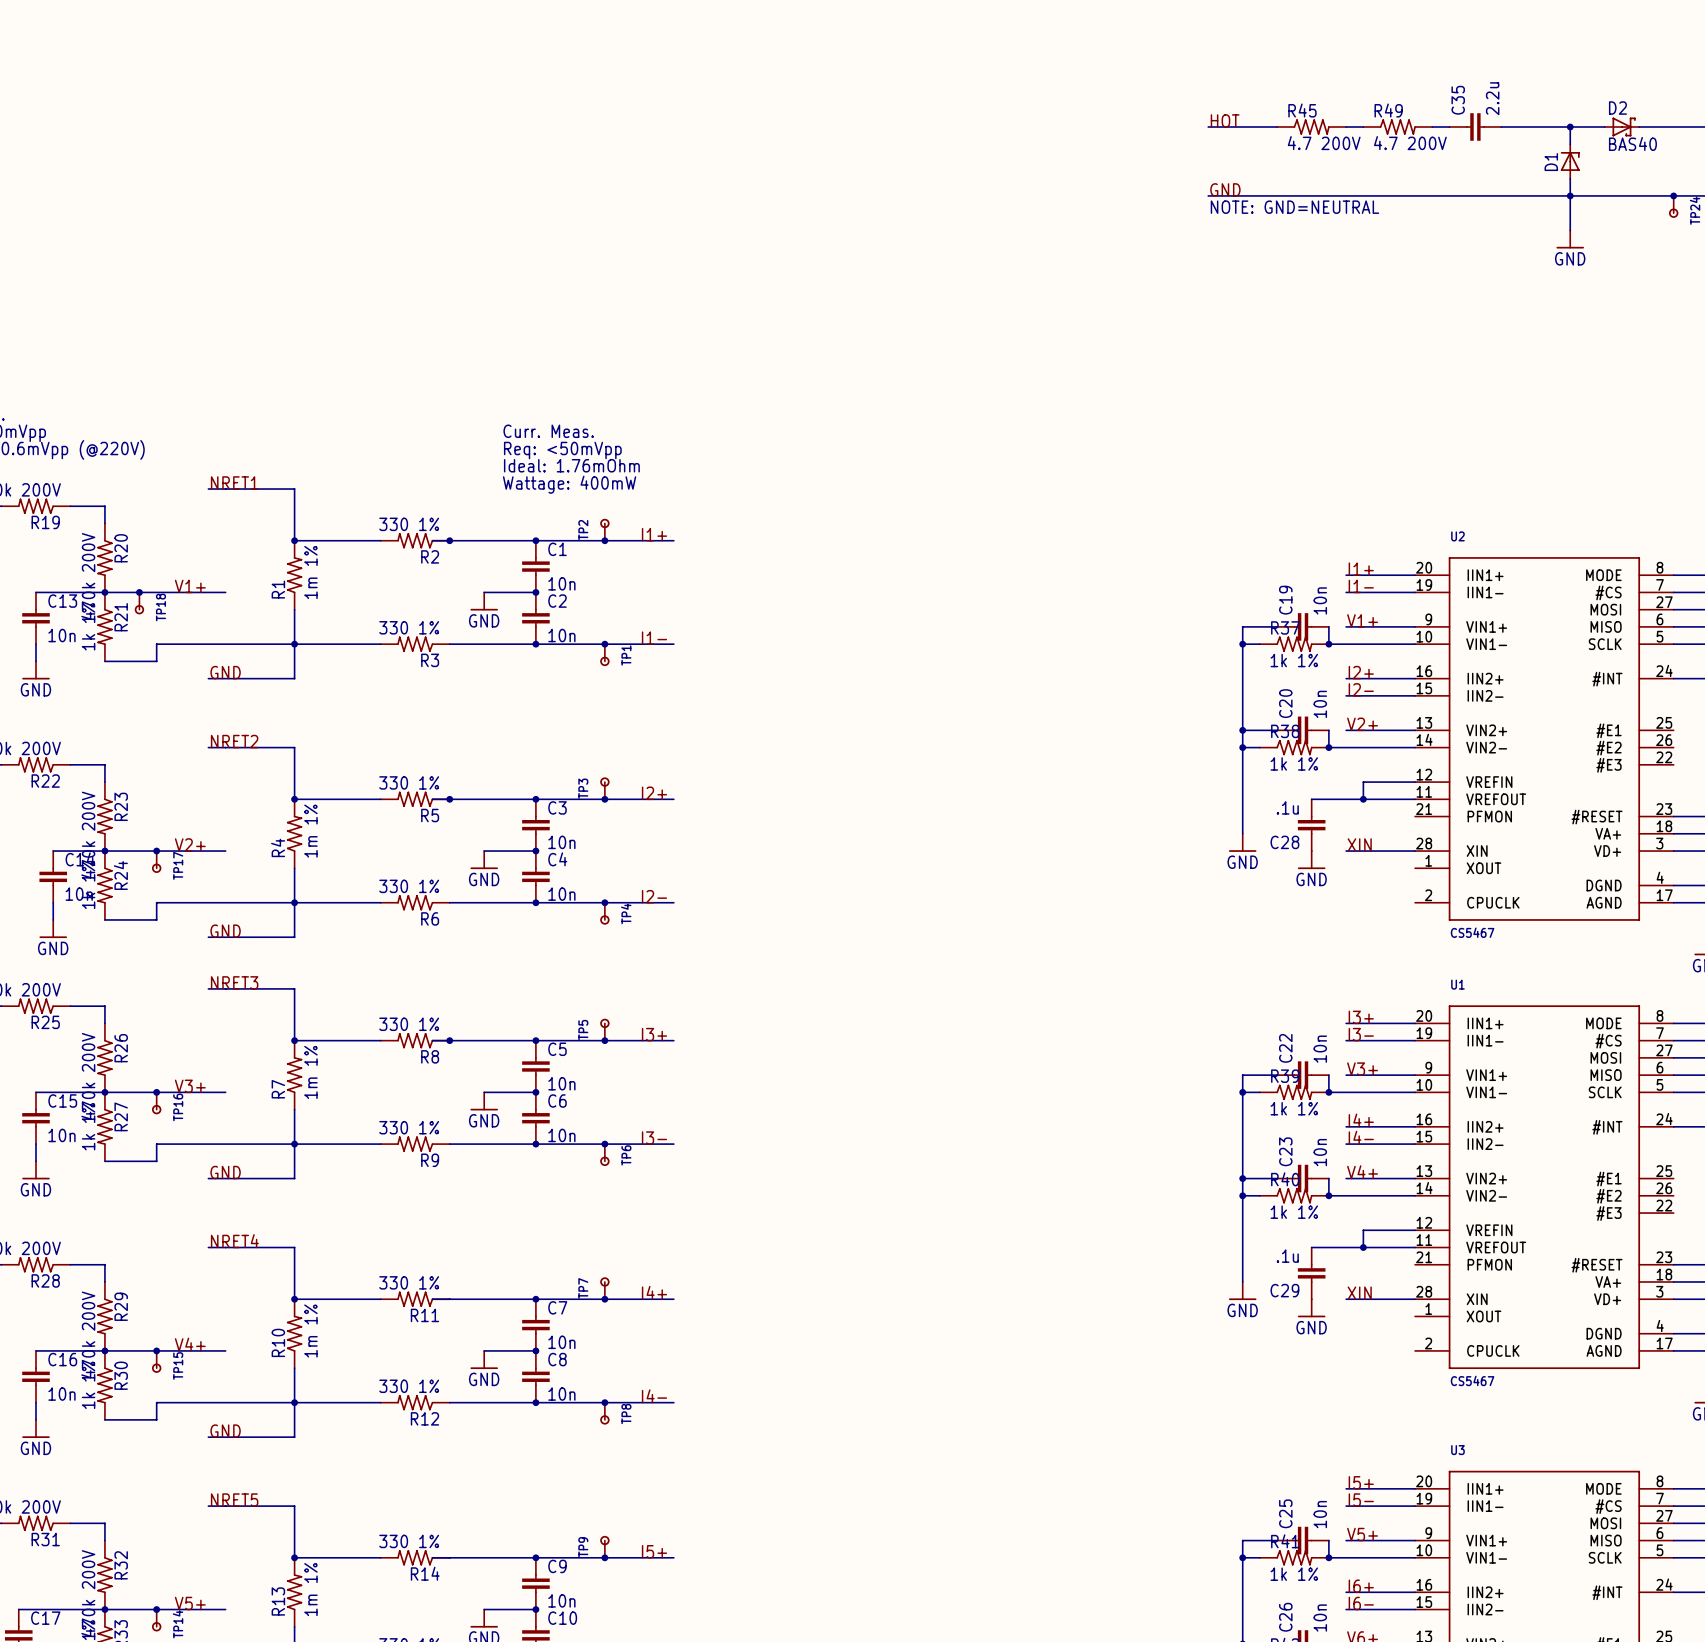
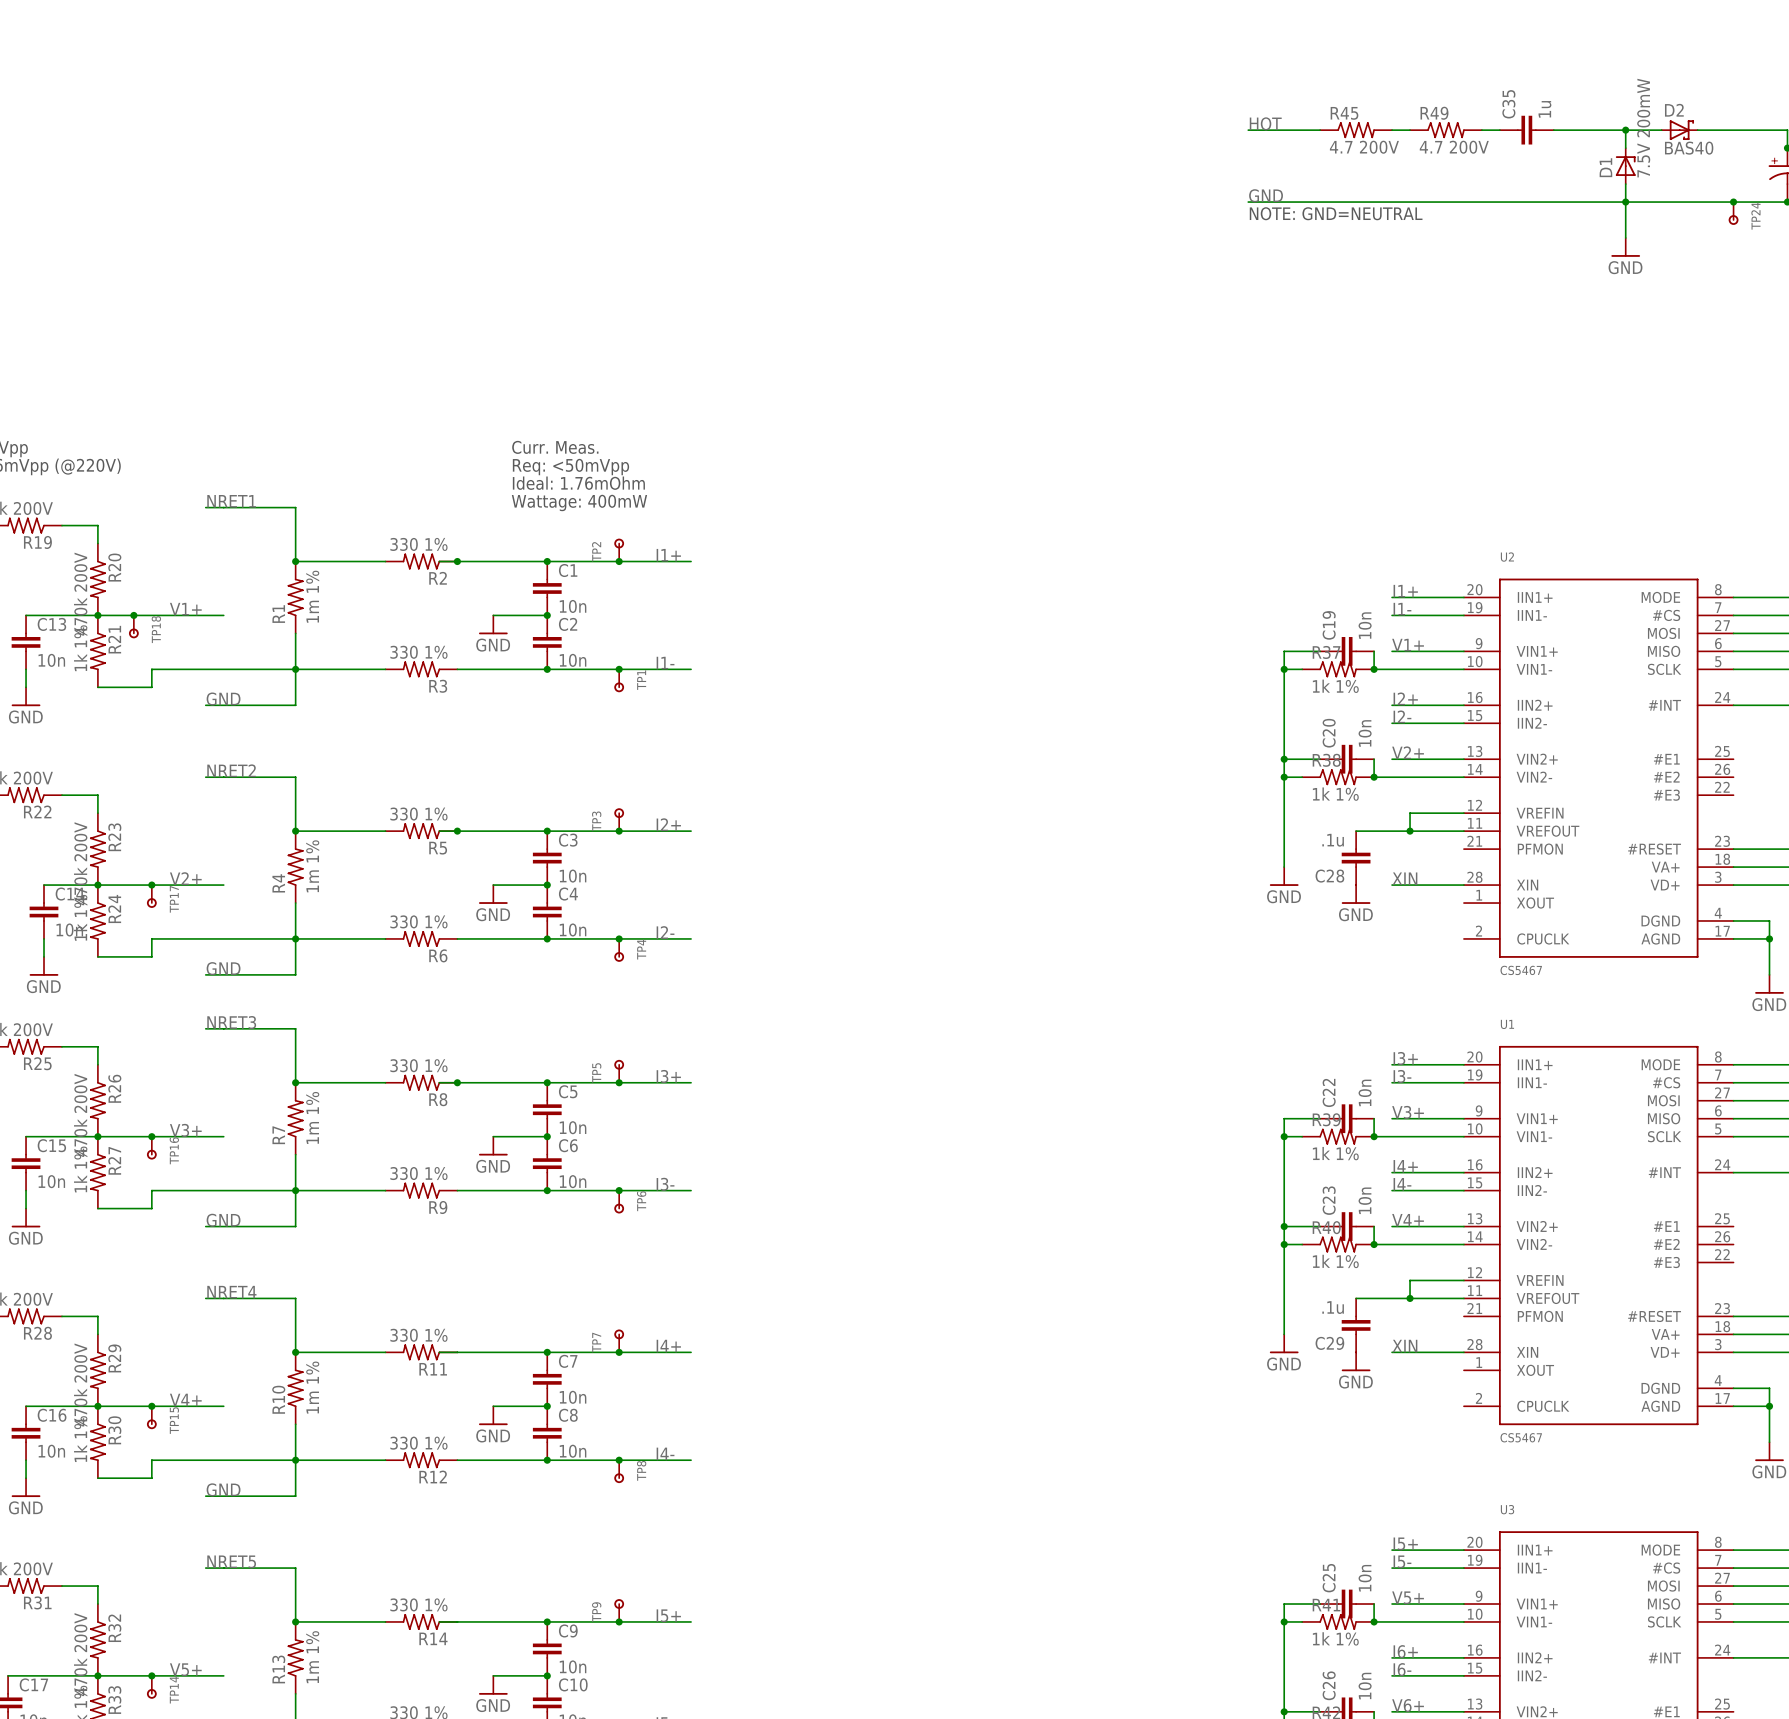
C35 value: 2.2u (1492, 98) -> 1u (1544, 109)
D1 value: none -> 7.5V 200mW (1643, 128)

